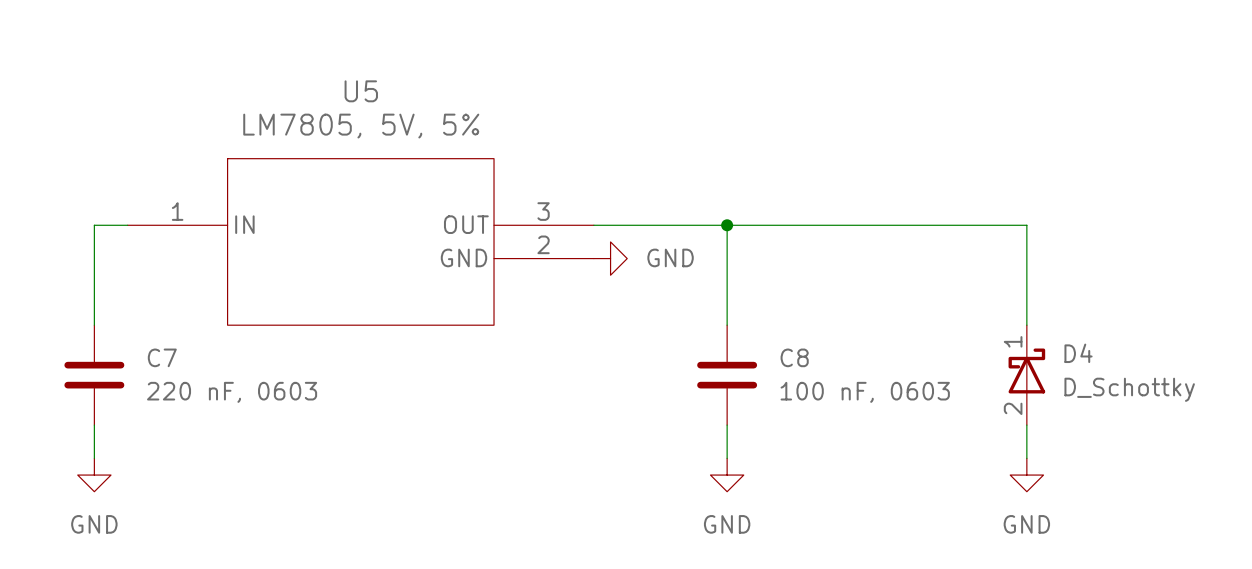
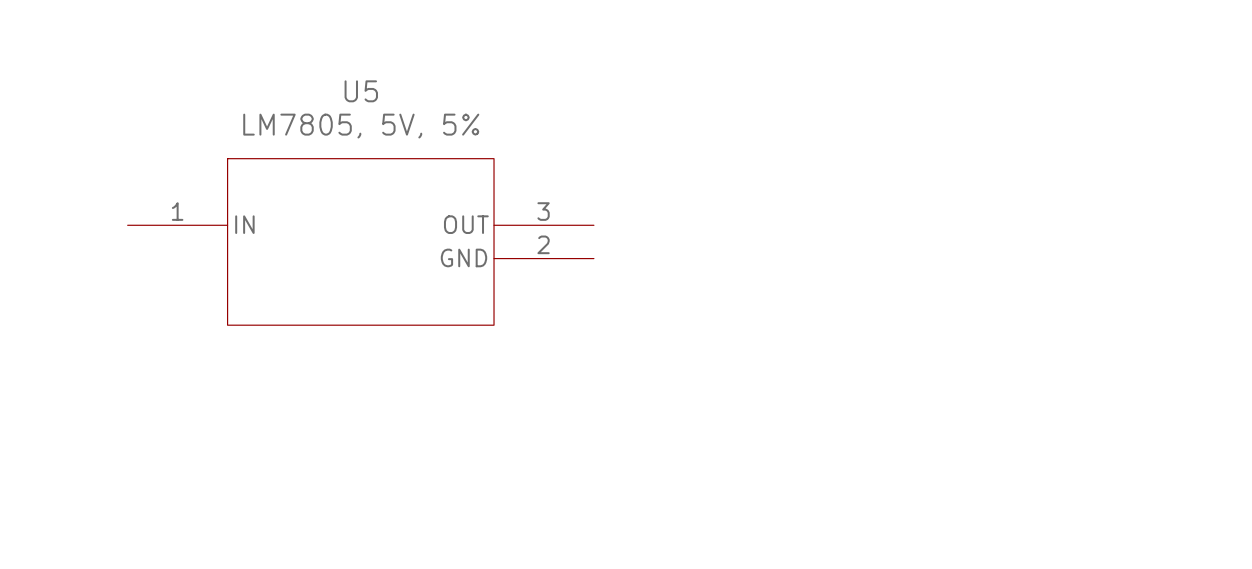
wire: (127, 225) (94, 225) (94, 325) -> none
wire: (593, 225) (1026, 225) (1026, 325) -> none
wire: (727, 225) (727, 325) -> none
junction: (727, 225) -> none
power symbol: GND (610, 258) -> none
C7: 220 nF, 0603 (94, 375) -> none
C8: 100 nF, 0603 (727, 375) -> none
D4: D_Schottky (1026, 375) -> none
wire: (94, 425) (94, 458) -> none
wire: (727, 425) (727, 458) -> none
wire: (1026, 425) (1026, 458) -> none
power symbol: GND (94, 475) -> none
power symbol: GND (727, 475) -> none
power symbol: GND (1026, 475) -> none

